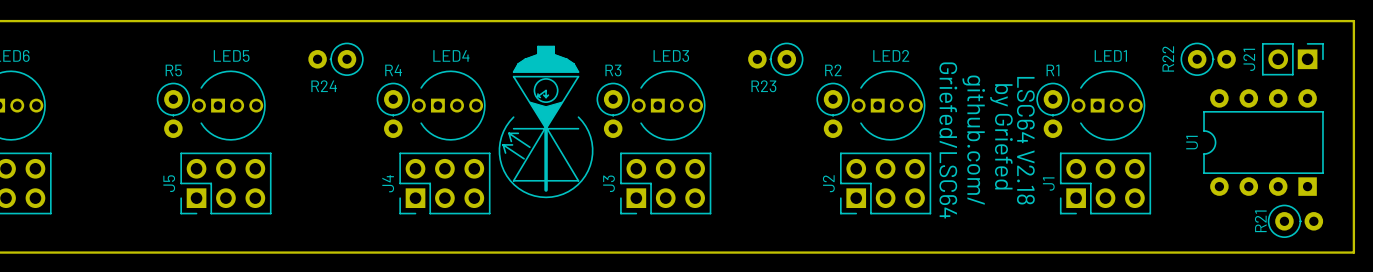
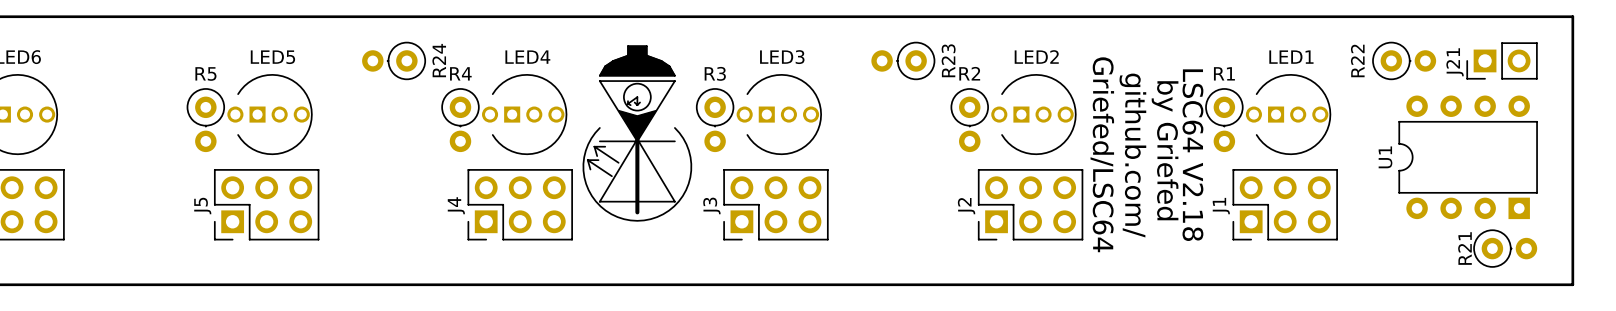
J21 rotation: 0° (1292, 59) -> 180° (1502, 60)
R24 name rotation: 0° (324, 86) -> 90° counterclockwise (439, 60)
R24 name position: R24 (324, 86) -> R24 (439, 60)
R23 name rotation: 0° (763, 86) -> 90° counterclockwise (948, 60)
R23 name position: R23 (763, 86) -> R23 (948, 60)

